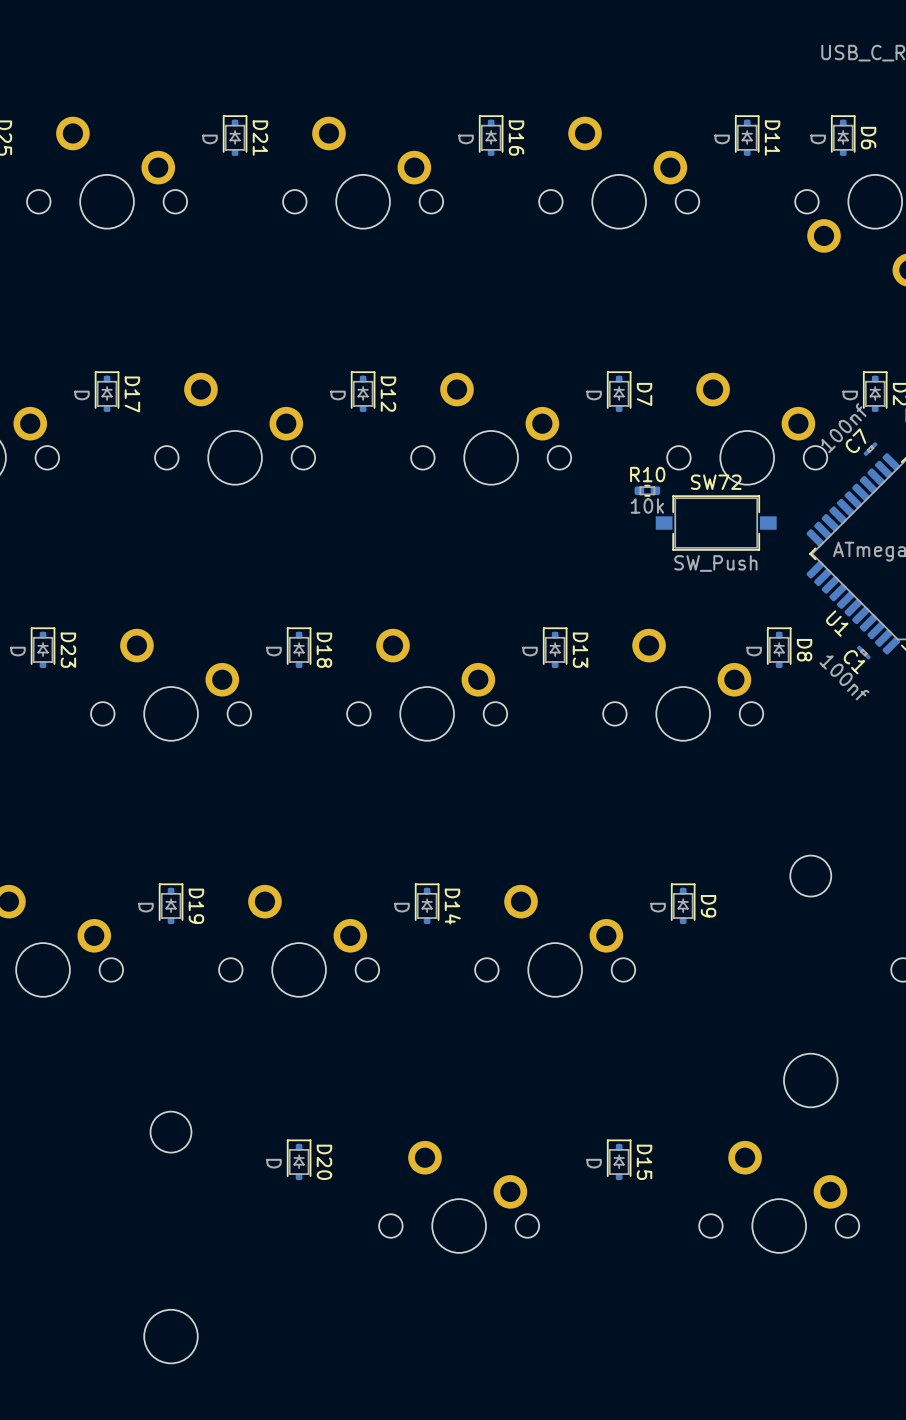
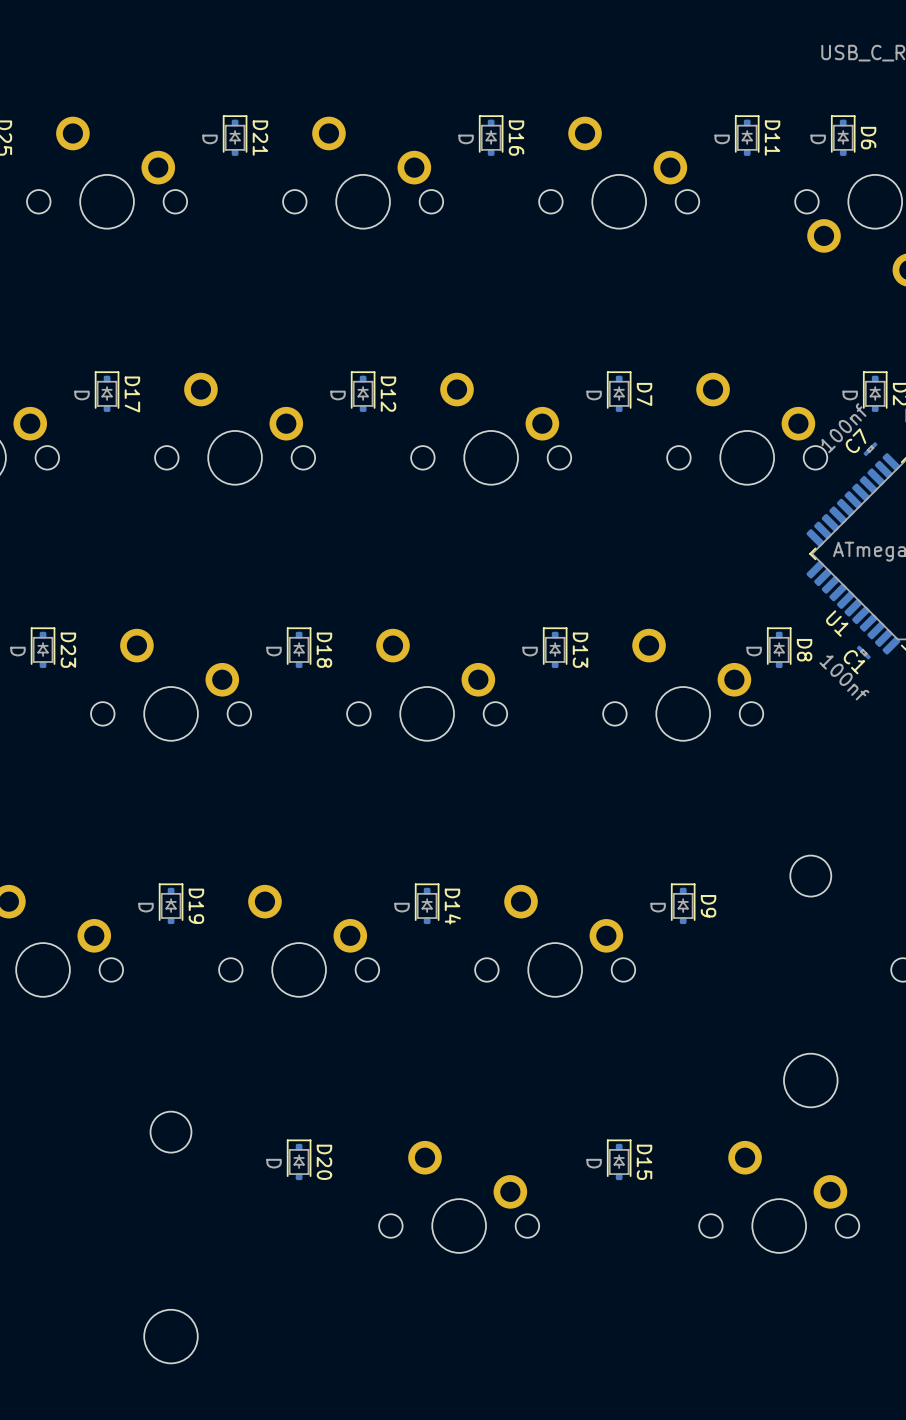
R10: 10k (647, 490) -> none
SW72: SW_Push (716, 523) -> none

